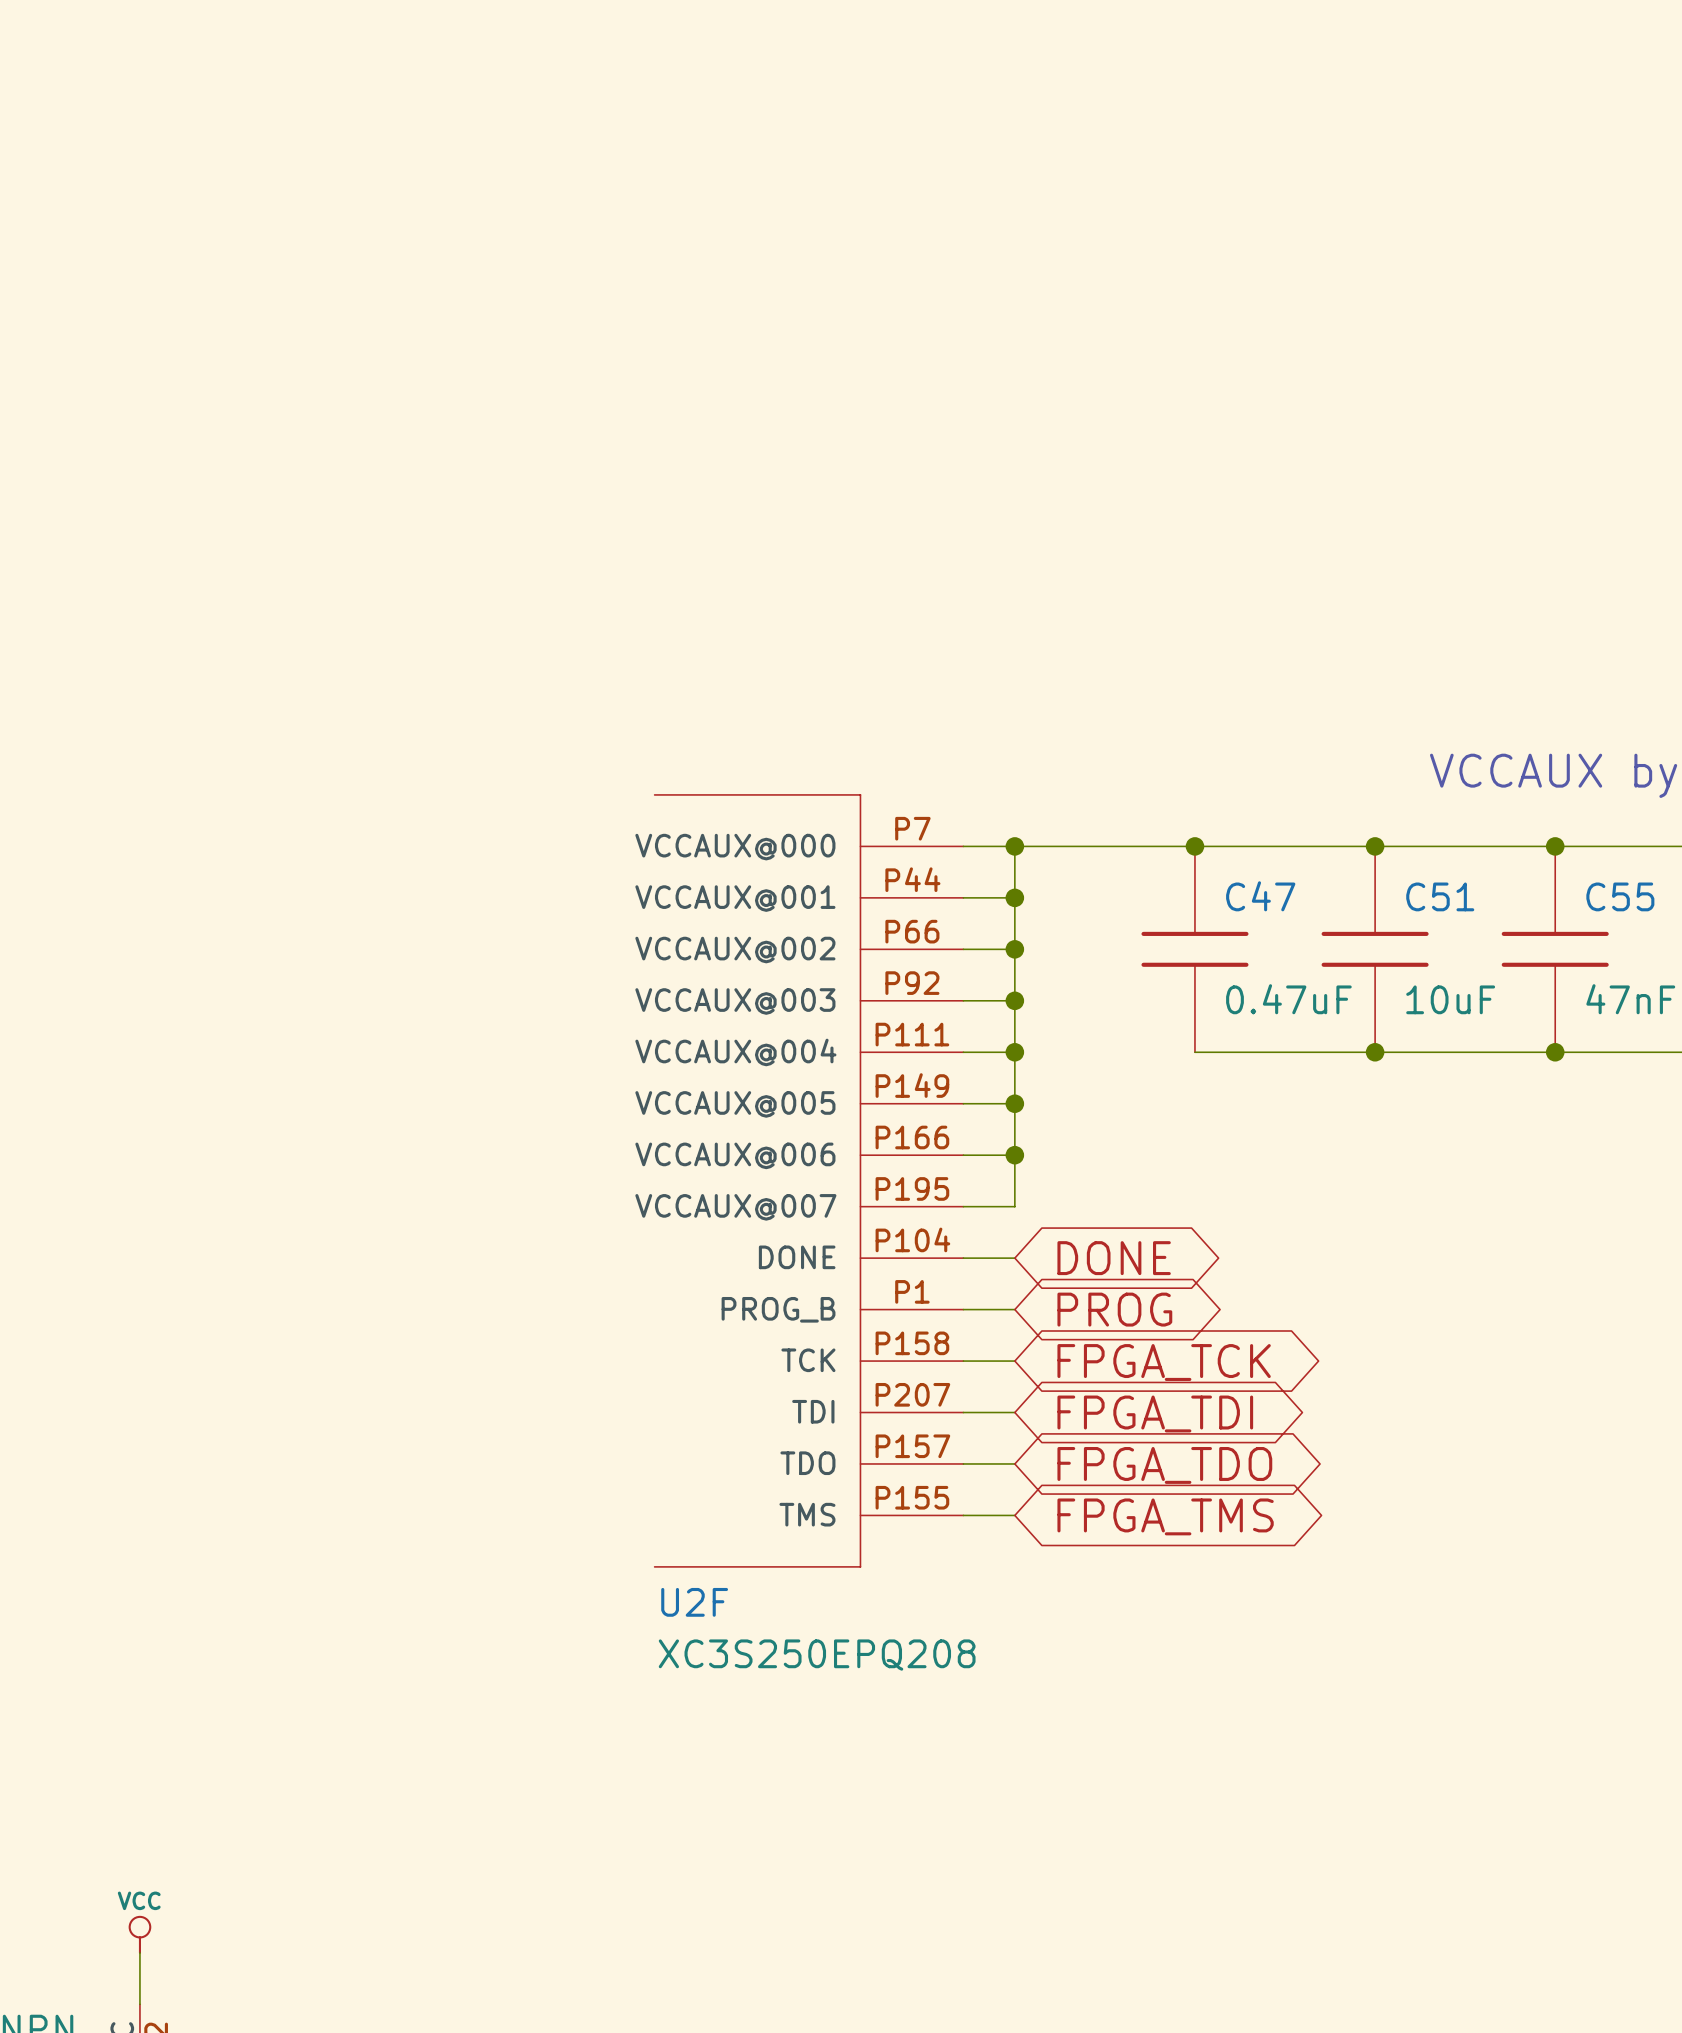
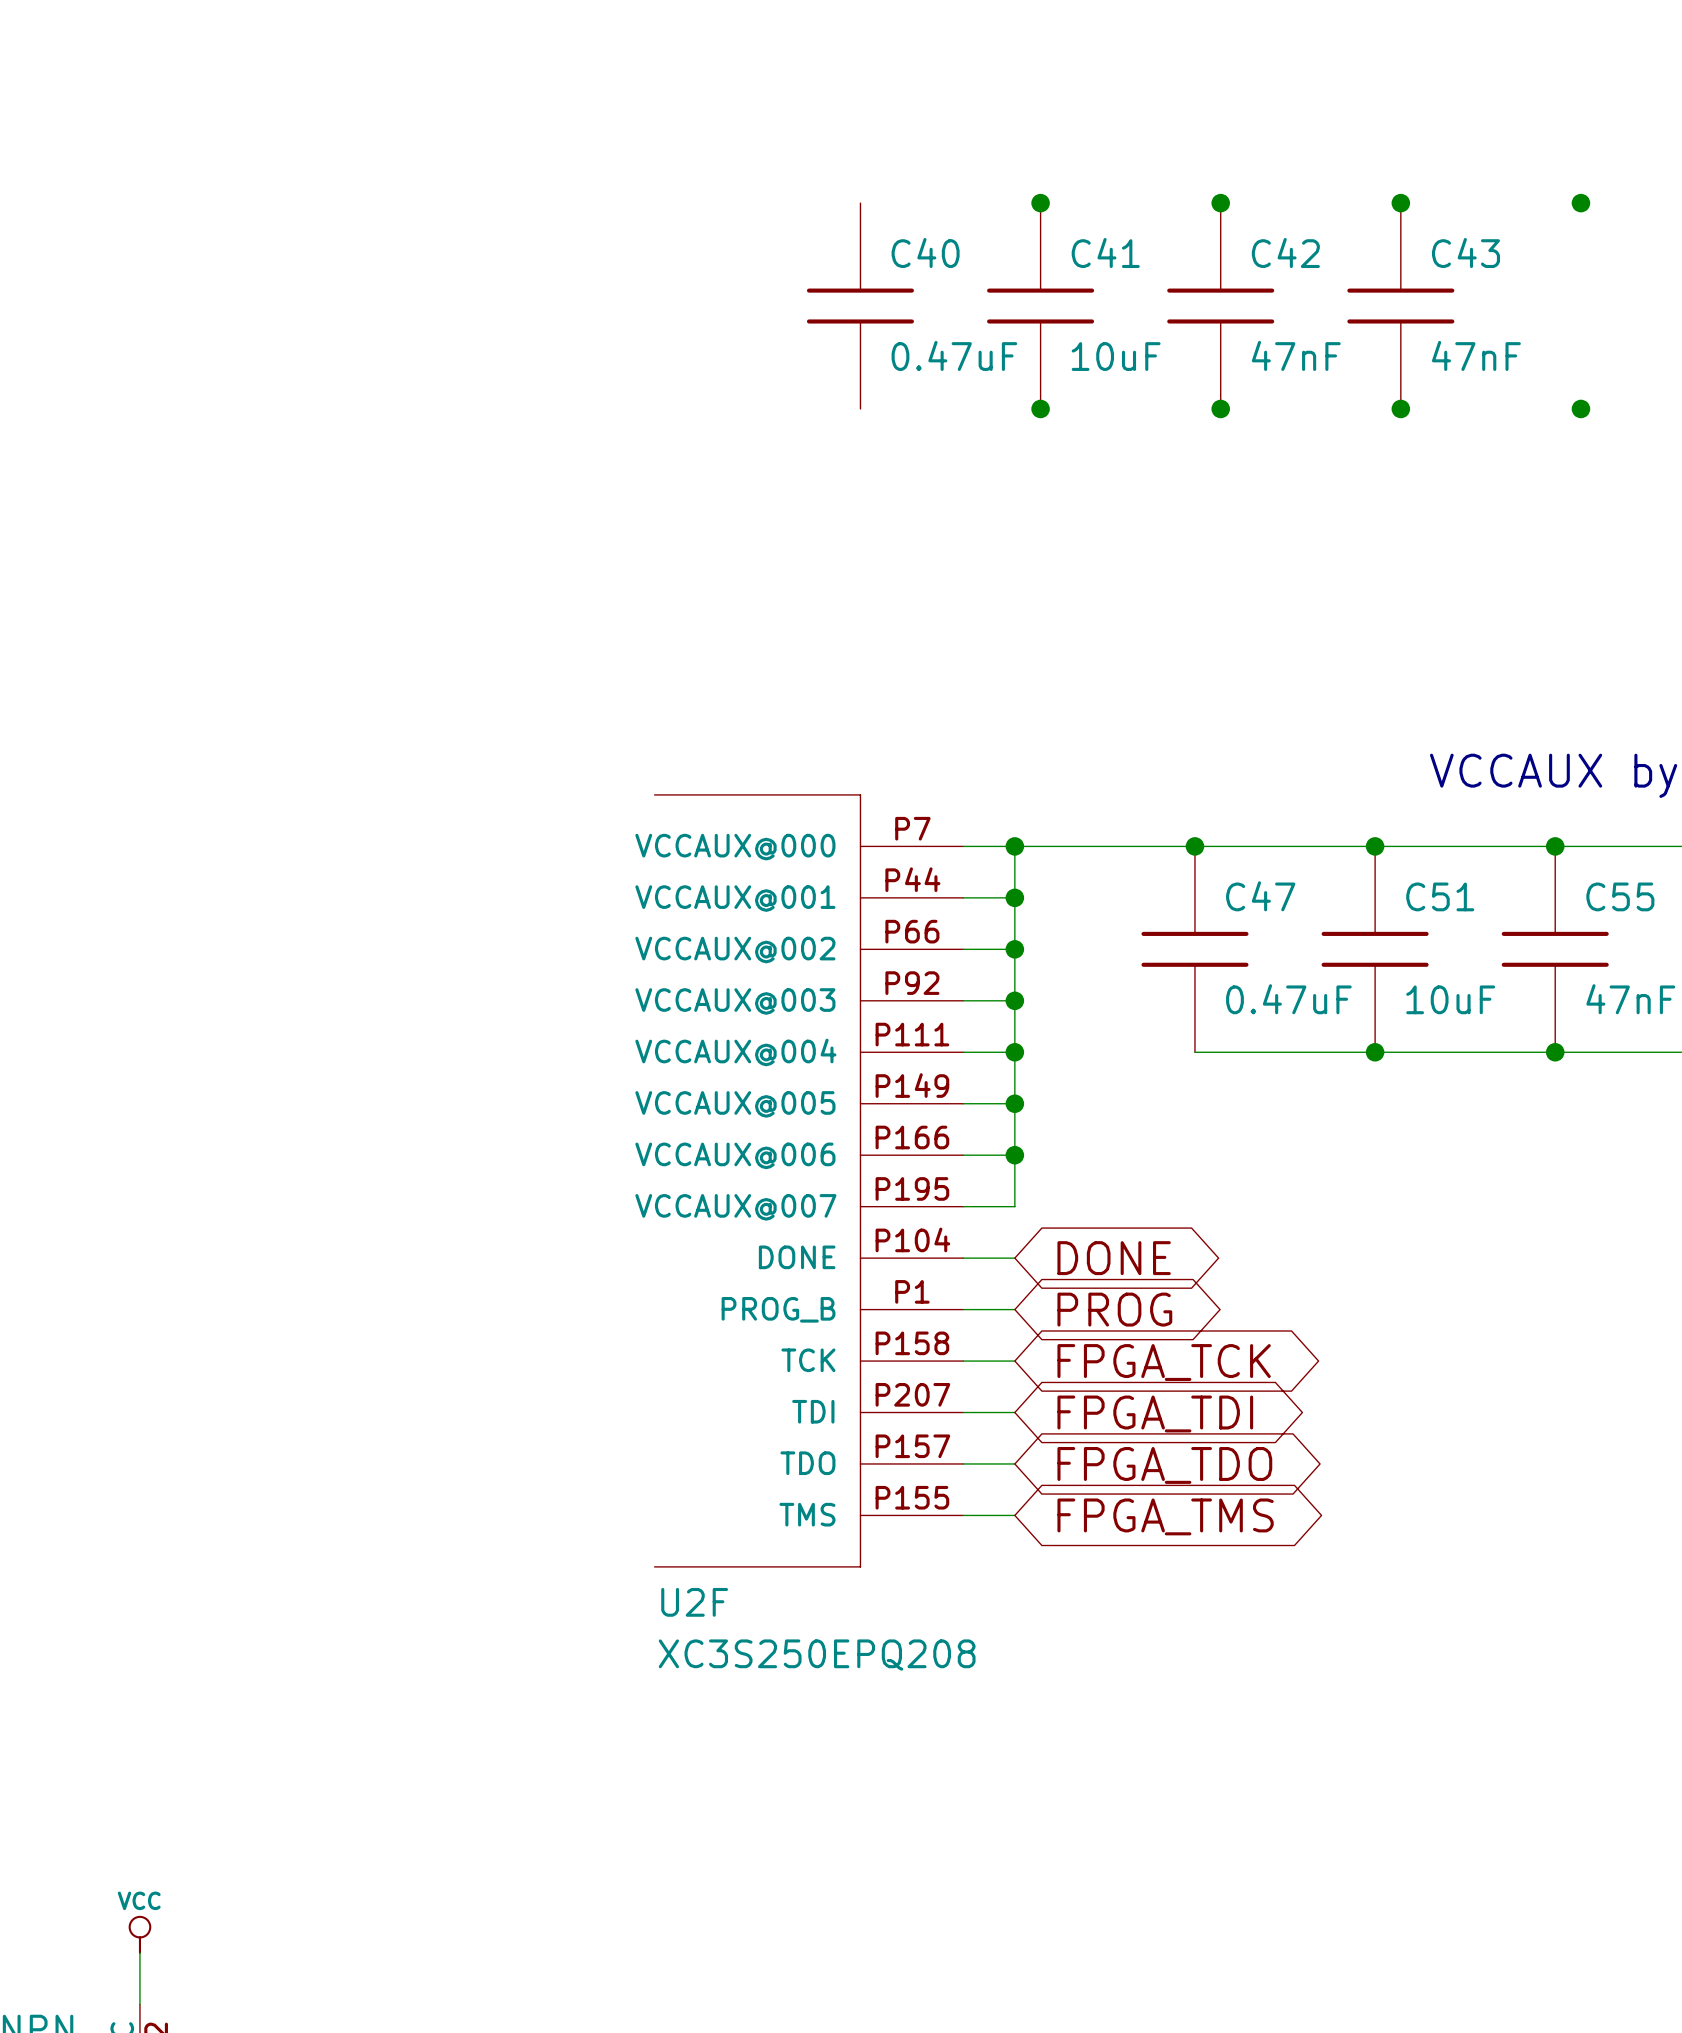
junction: none -> (1040, 203)
junction: none -> (1220, 203)
junction: none -> (1400, 203)
junction: none -> (1580, 203)
C40: none -> 0.47uF (860, 306)
C41: none -> 10uF (1040, 306)
C42: none -> 47nF (1220, 306)
C43: none -> 47nF (1400, 306)
junction: none -> (1040, 408)
junction: none -> (1220, 408)
junction: none -> (1400, 408)
junction: none -> (1580, 408)

